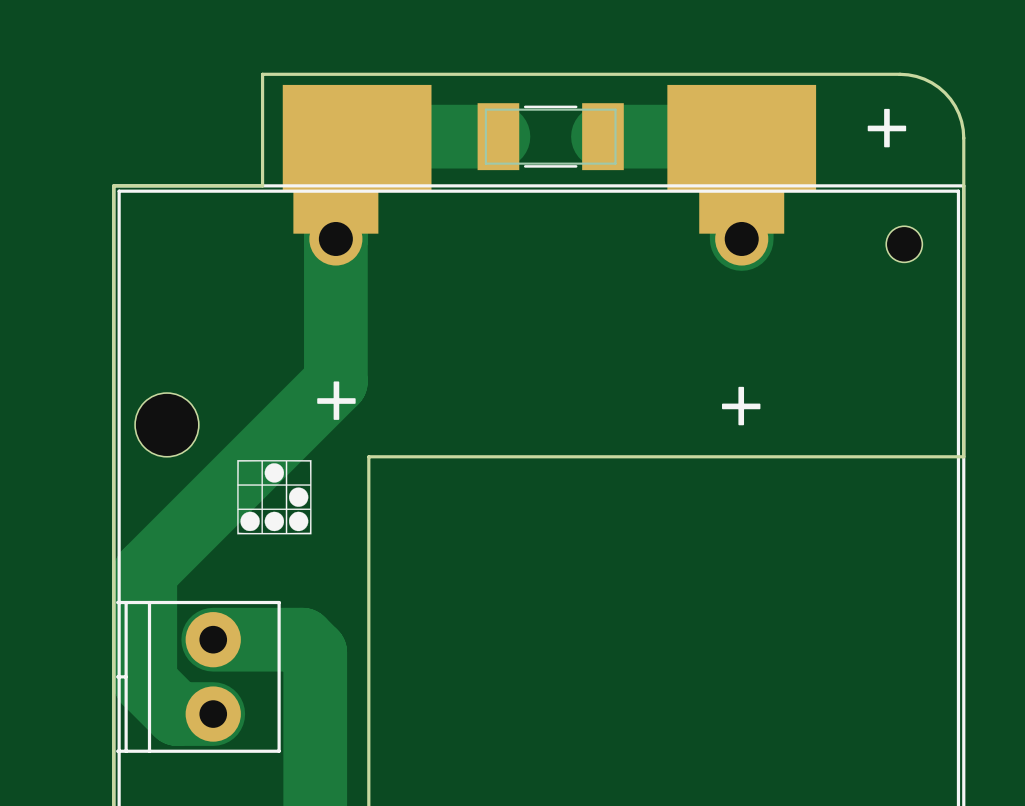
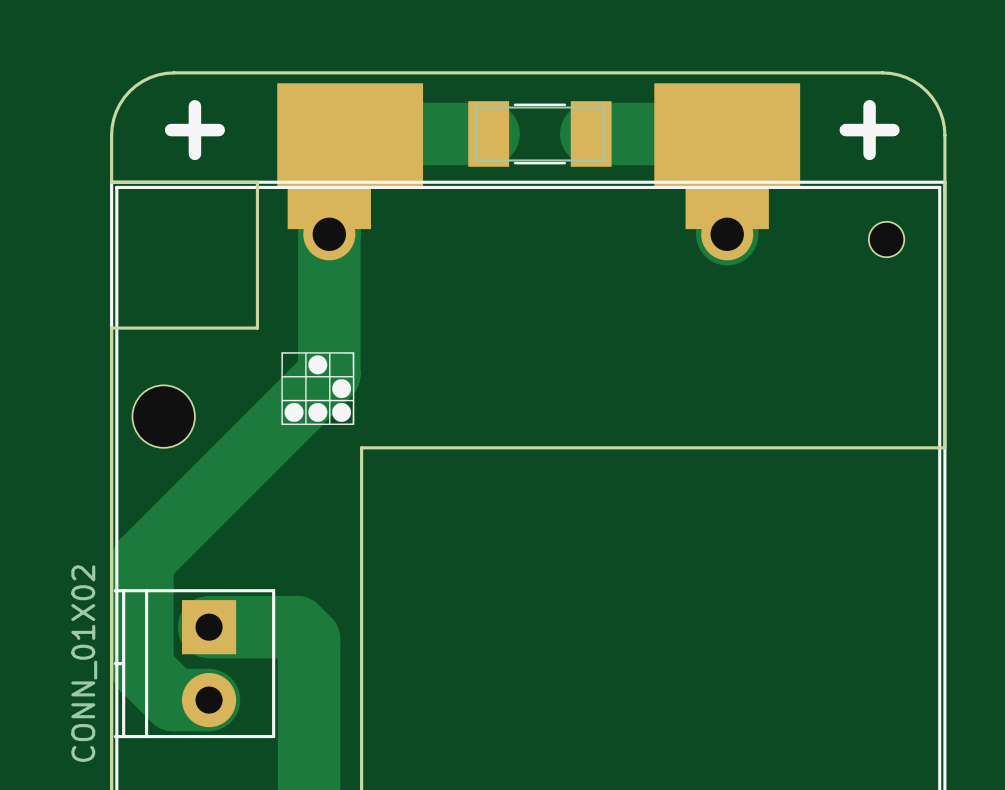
board edge: (262, 74) (262, 185) -> (257, 72) (165, 73) (150, 77) (136, 85) (124, 97) (113, 119) (111, 135) (111, 182)
text: none -> + (194, 130)
board edge: (113, 185) (113, 334) -> (257, 182) (257, 328) (111, 328)
text: + (336, 400) -> none
text: + (741, 406) -> none
drawing position: (274, 497) -> (317, 388)
part footprint: [116, 600, 281, 753] -> [113, 589, 276, 739]
part value: none -> CONN_01X02 (84, 663)

